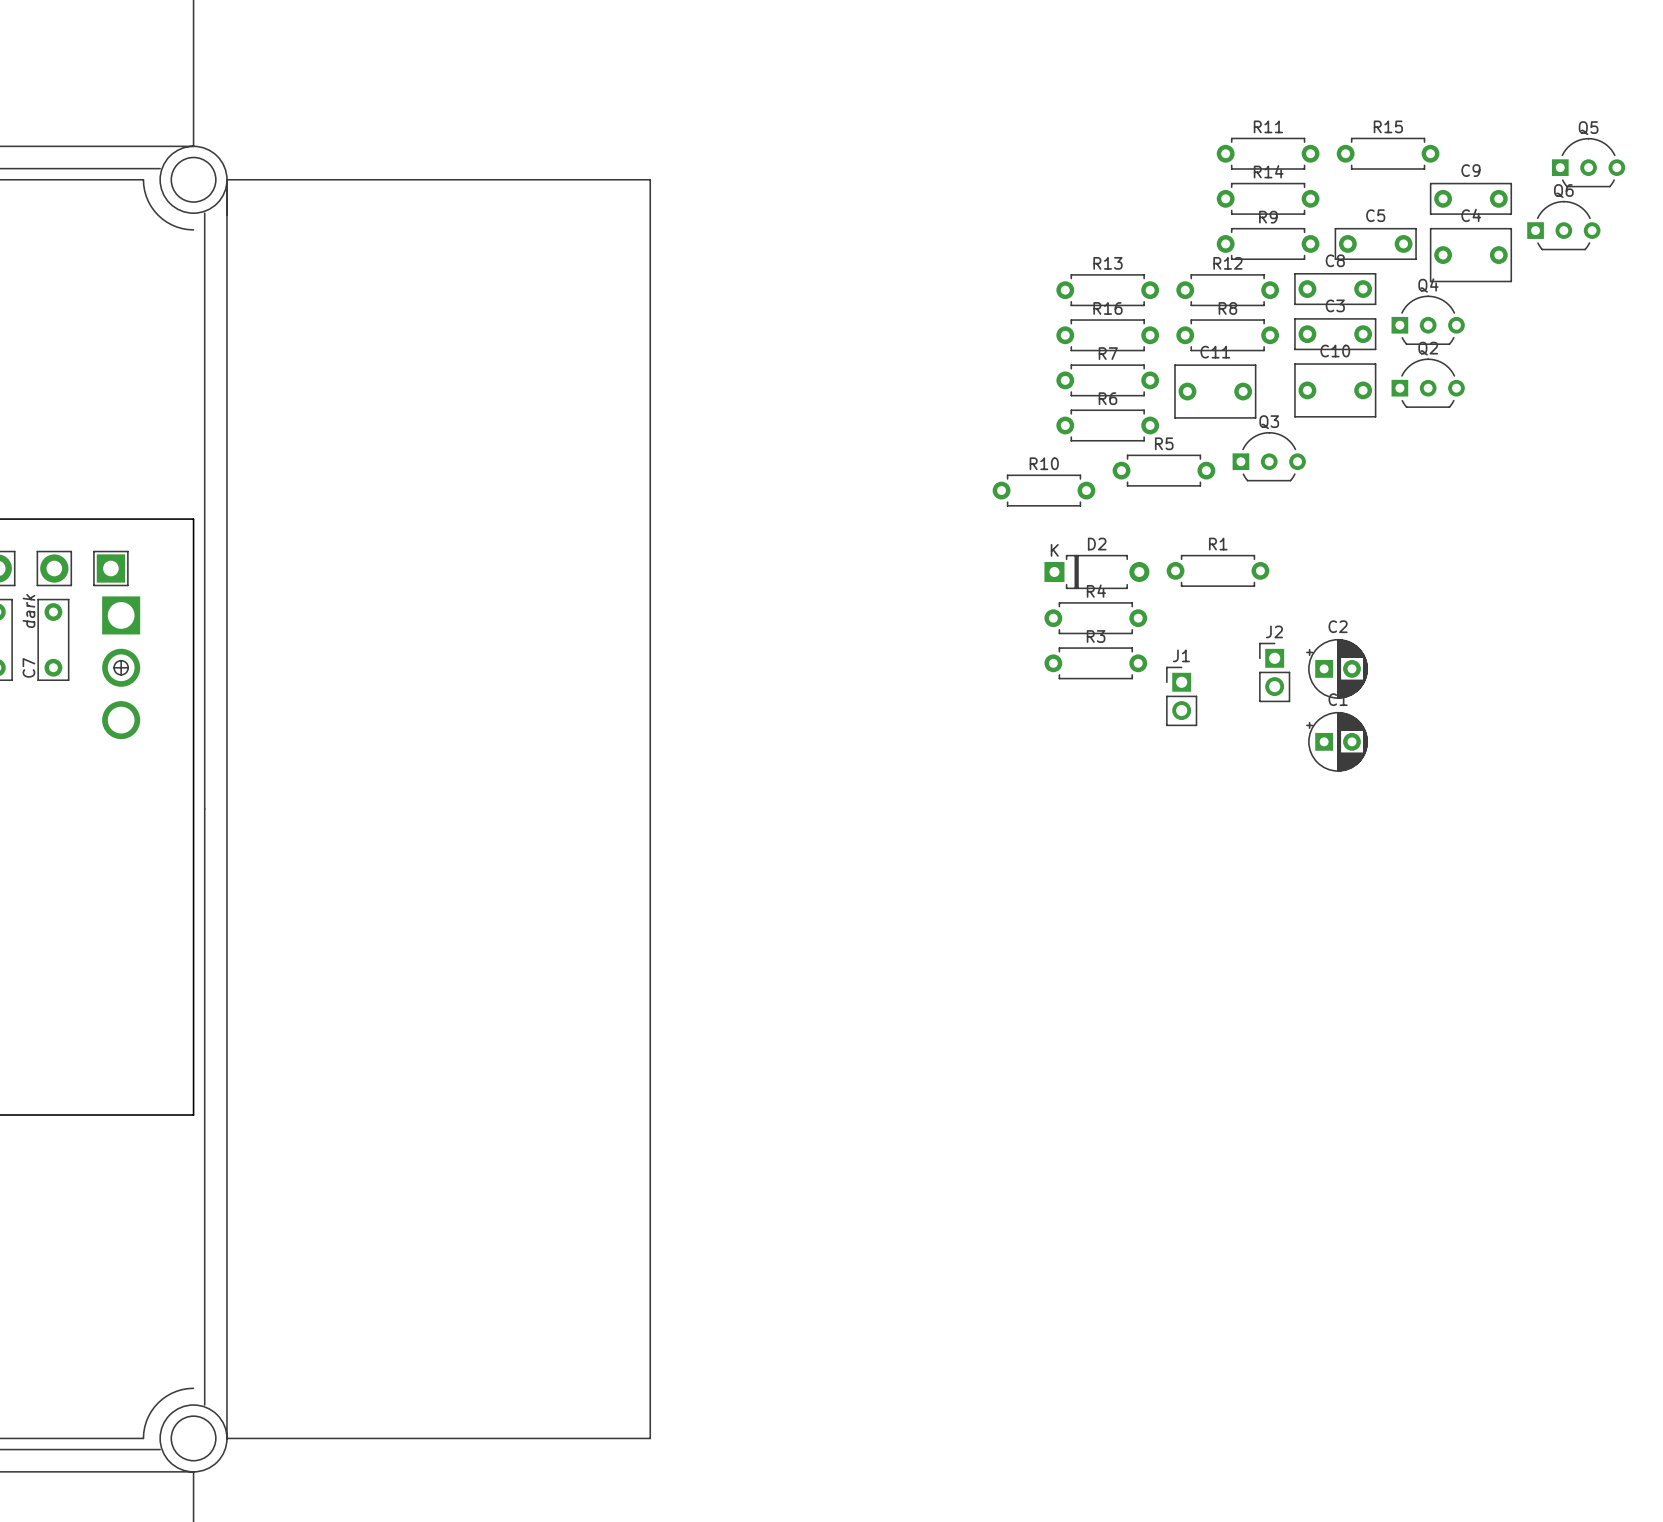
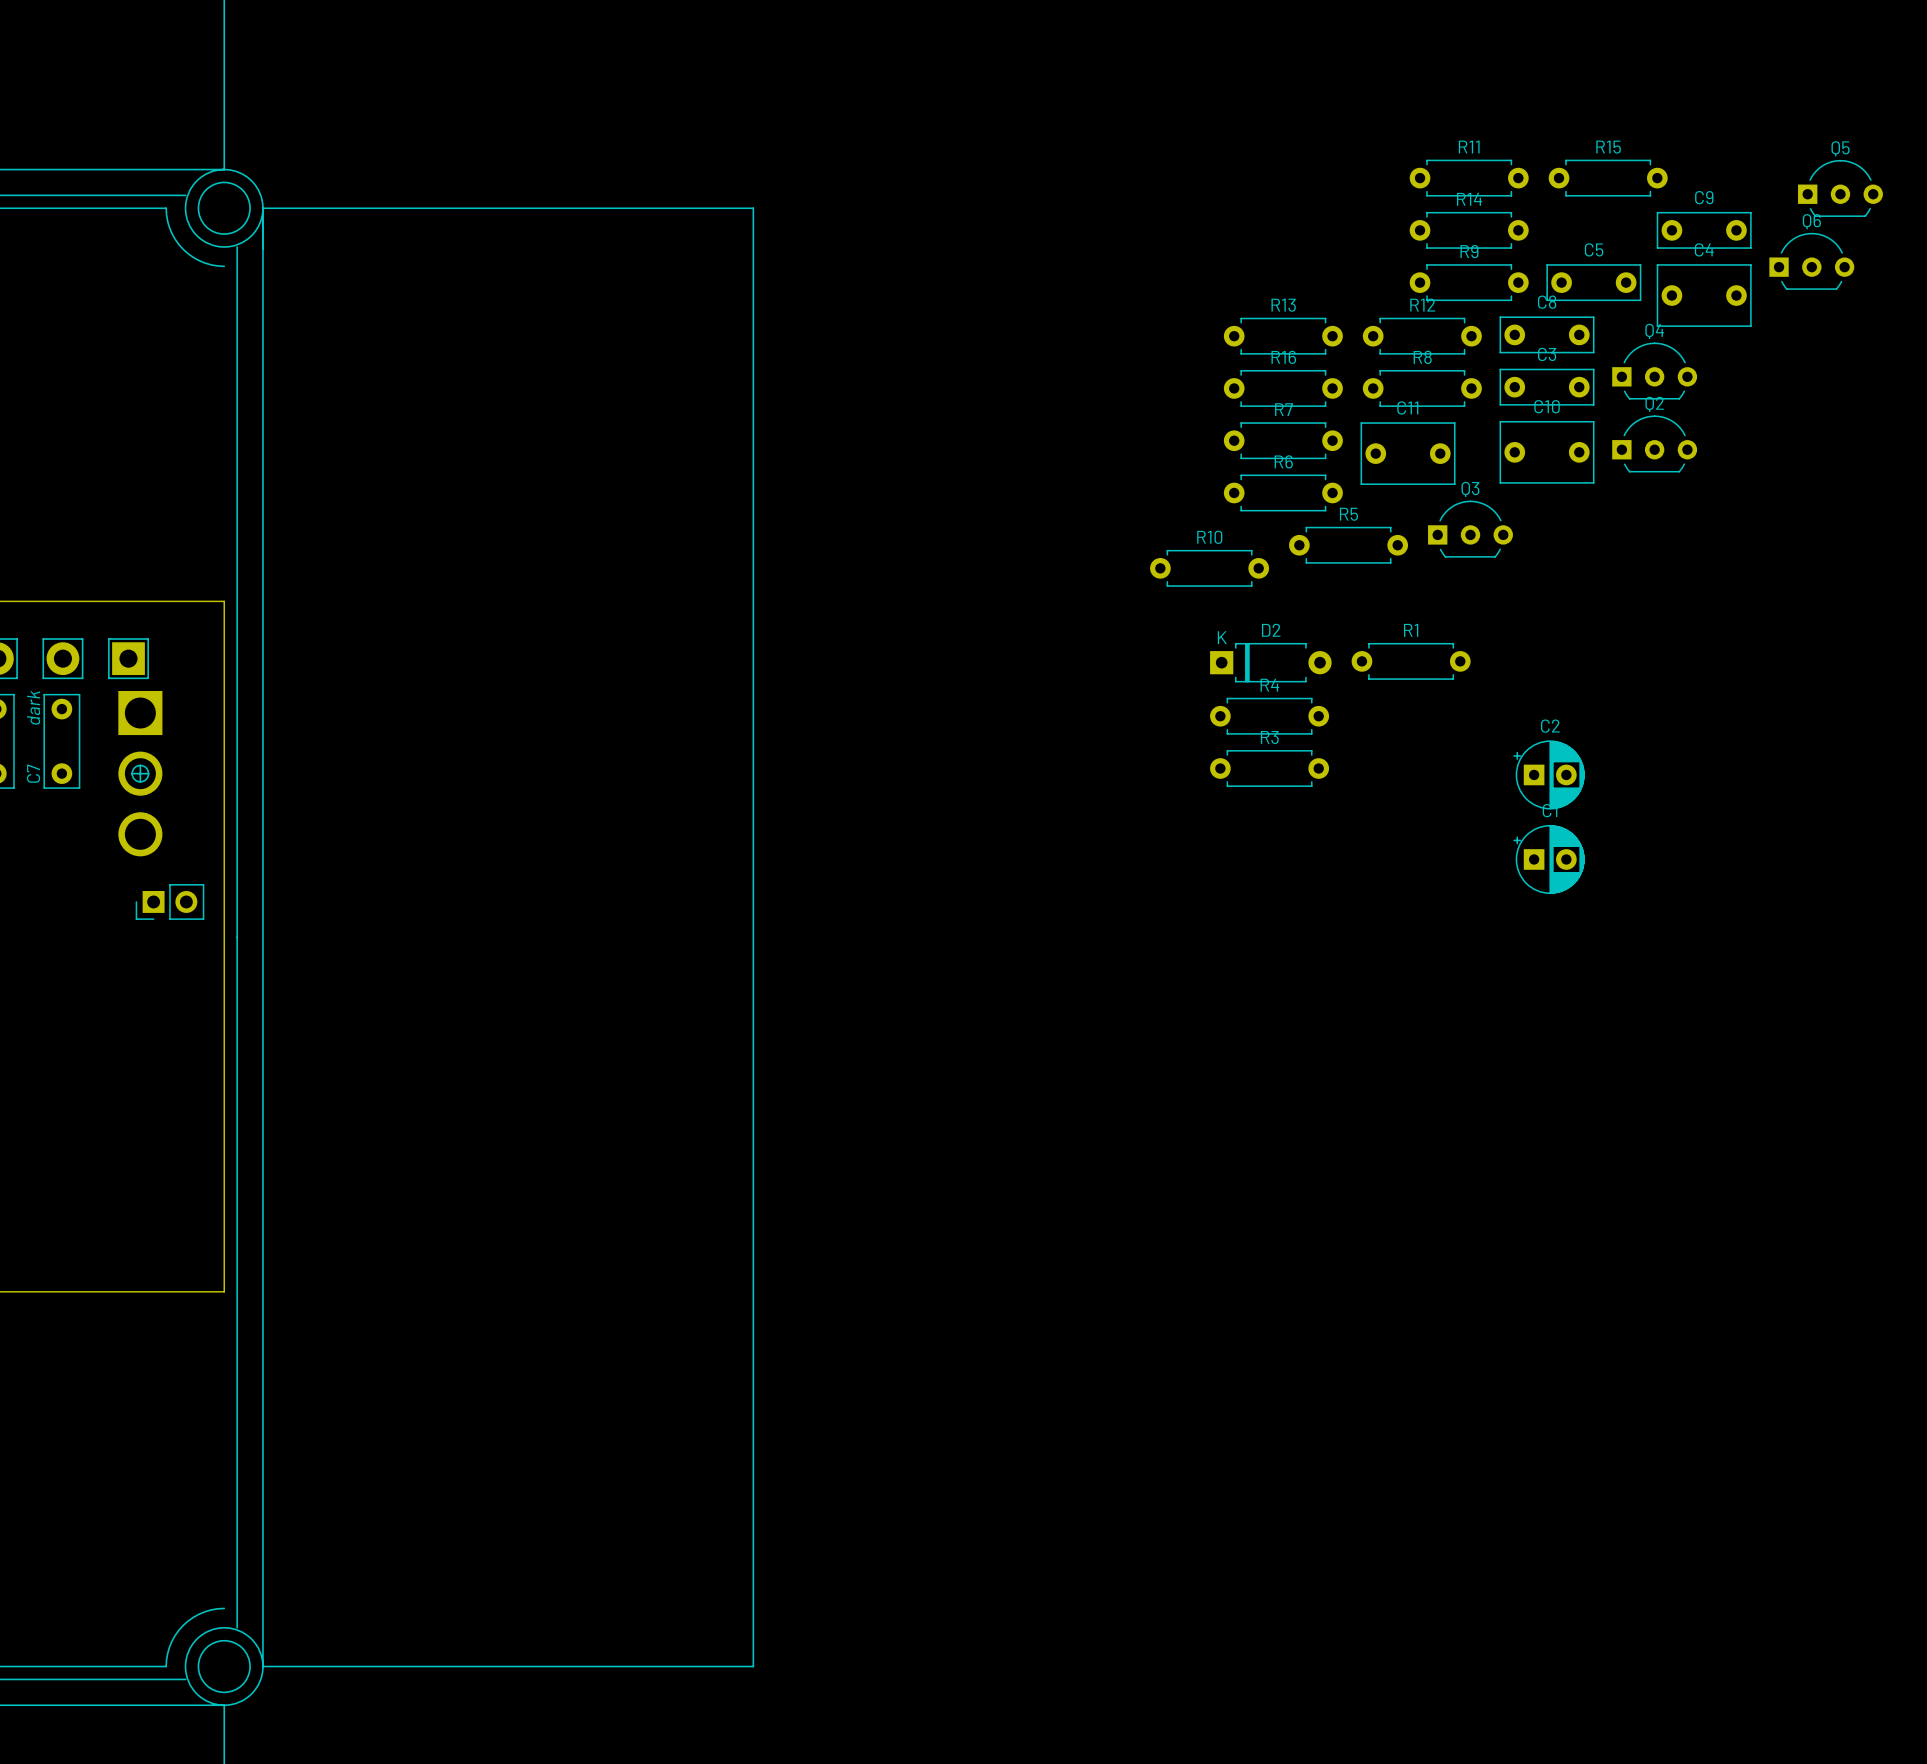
J2: (1274, 672) -> none
J1: (1181, 696) -> none
part: none -> (169, 901)

